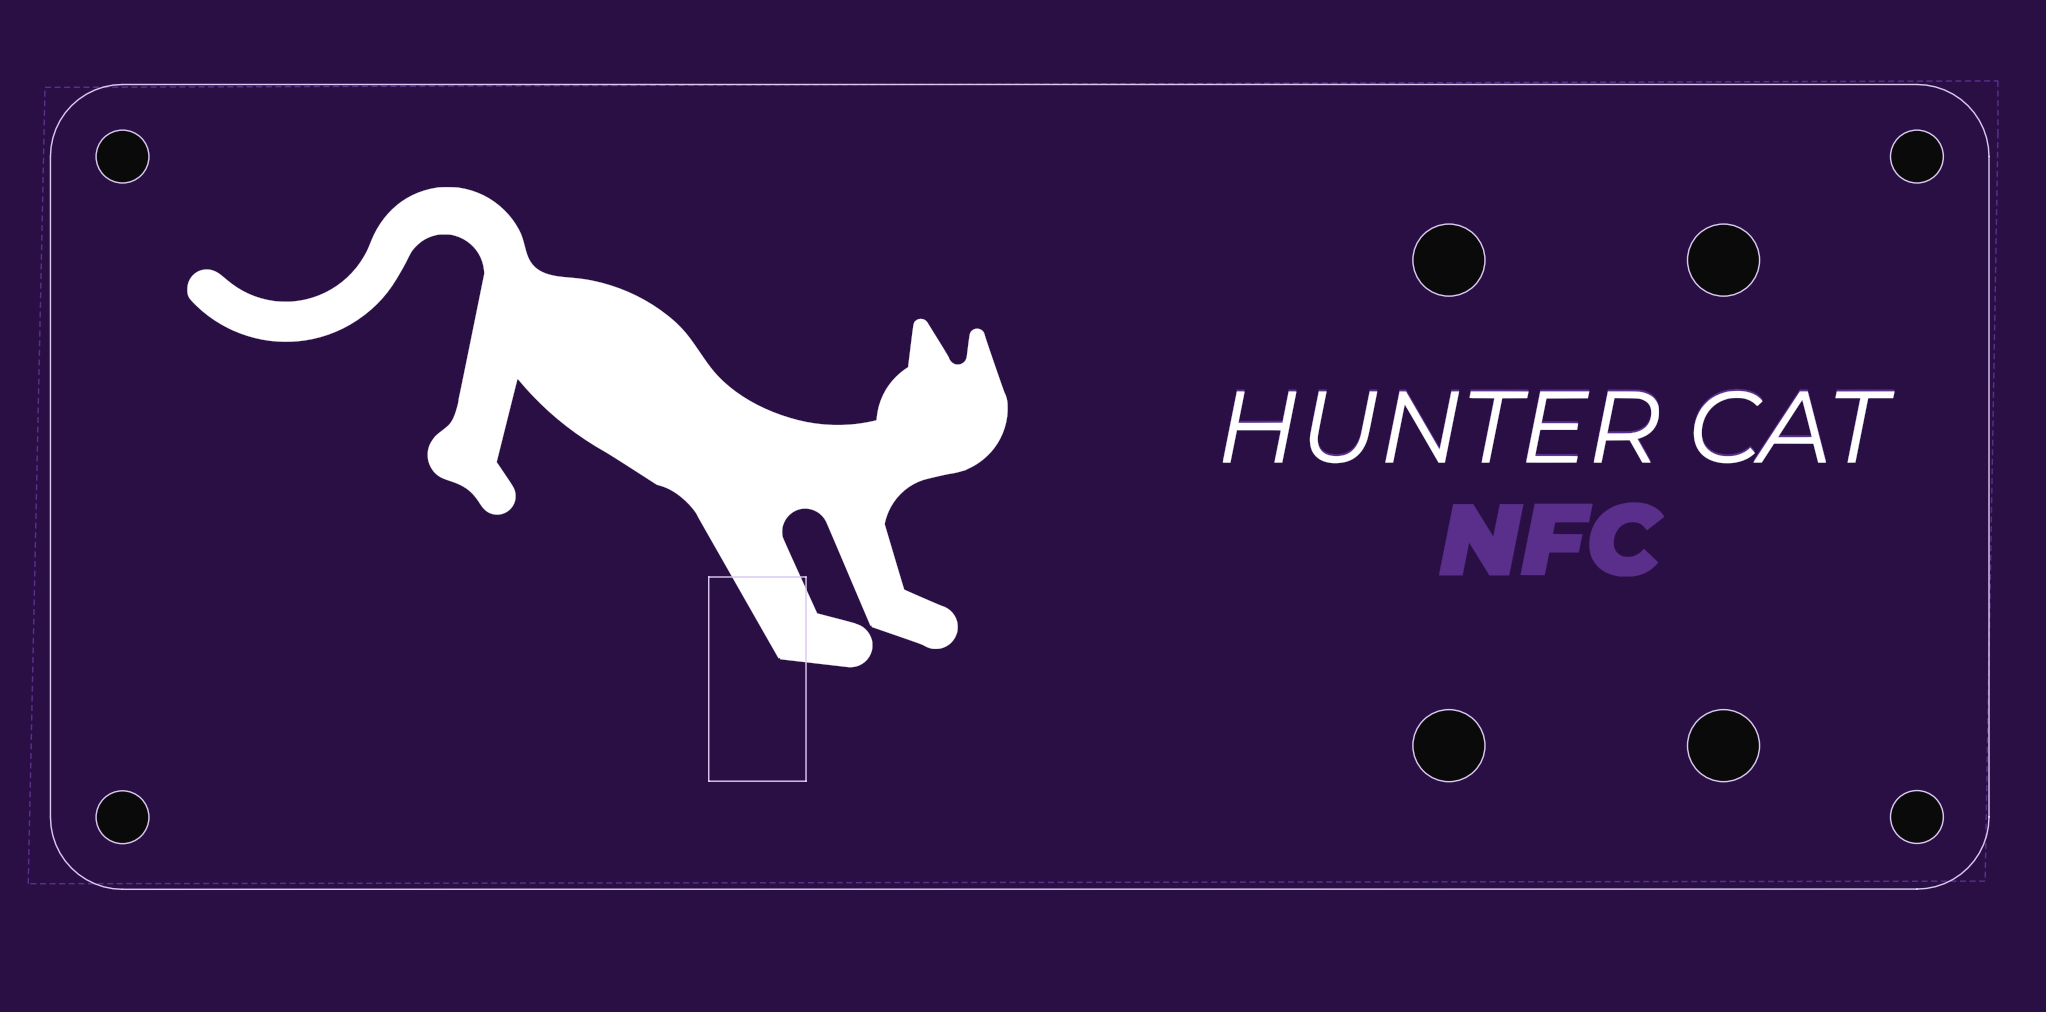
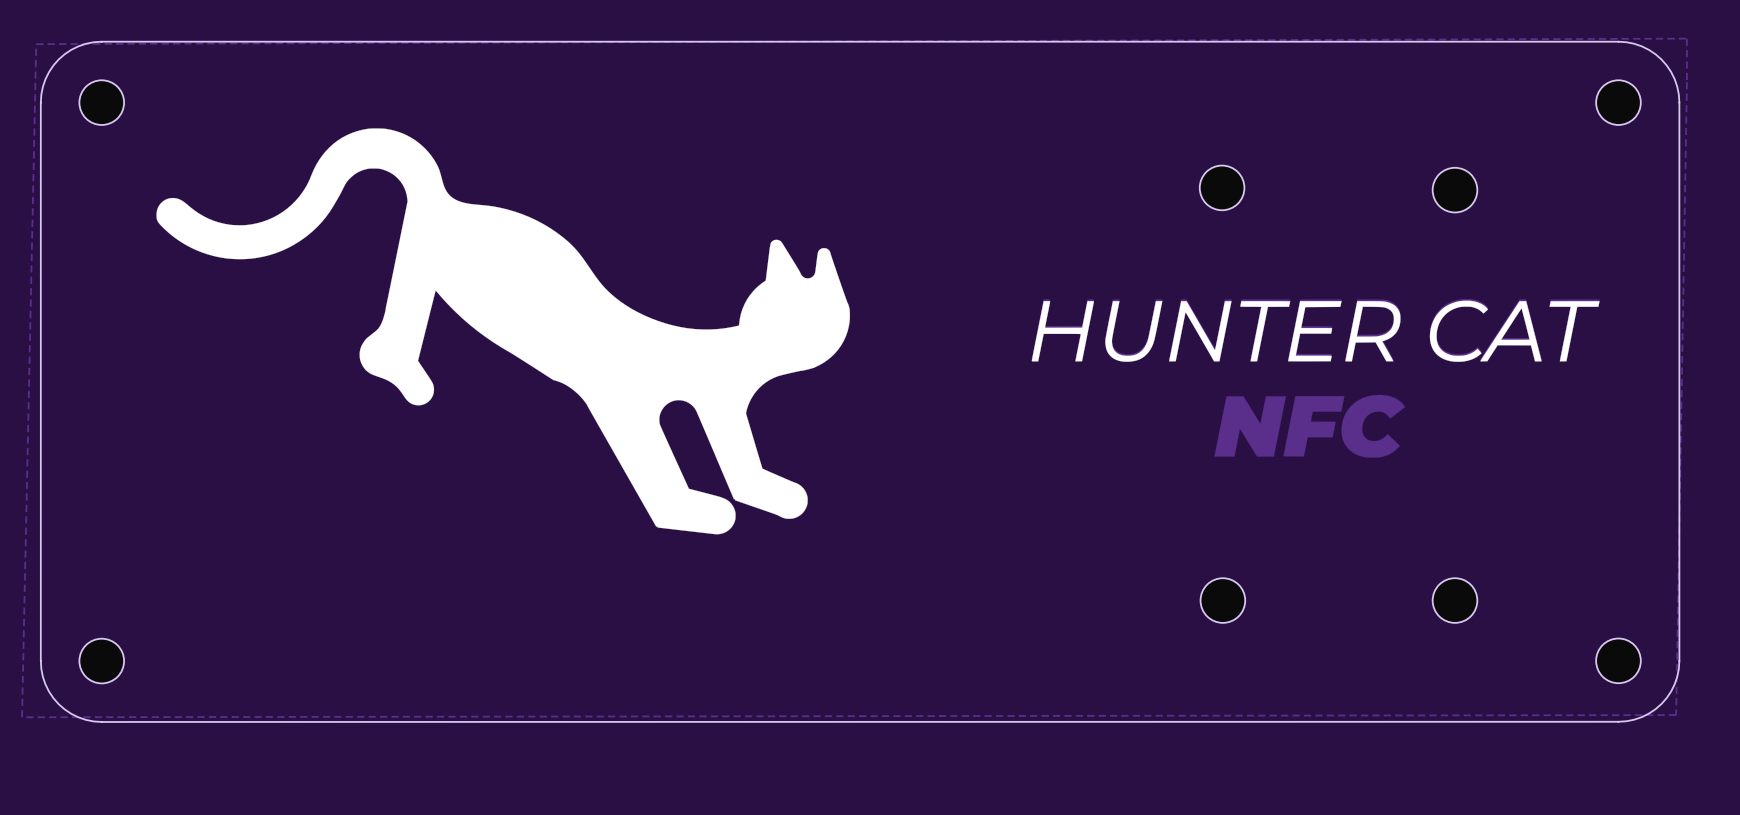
part footprint: [1412, 224, 1485, 297] -> [1199, 165, 1245, 211]
part footprint: [1687, 224, 1760, 297] -> [1432, 167, 1478, 213]
board edge: (708, 576) (708, 781) (806, 781) (806, 576) (708, 576) -> none
part footprint: [1412, 709, 1485, 782] -> [1200, 578, 1246, 623]
part footprint: [1687, 709, 1760, 782] -> [1432, 578, 1478, 623]

